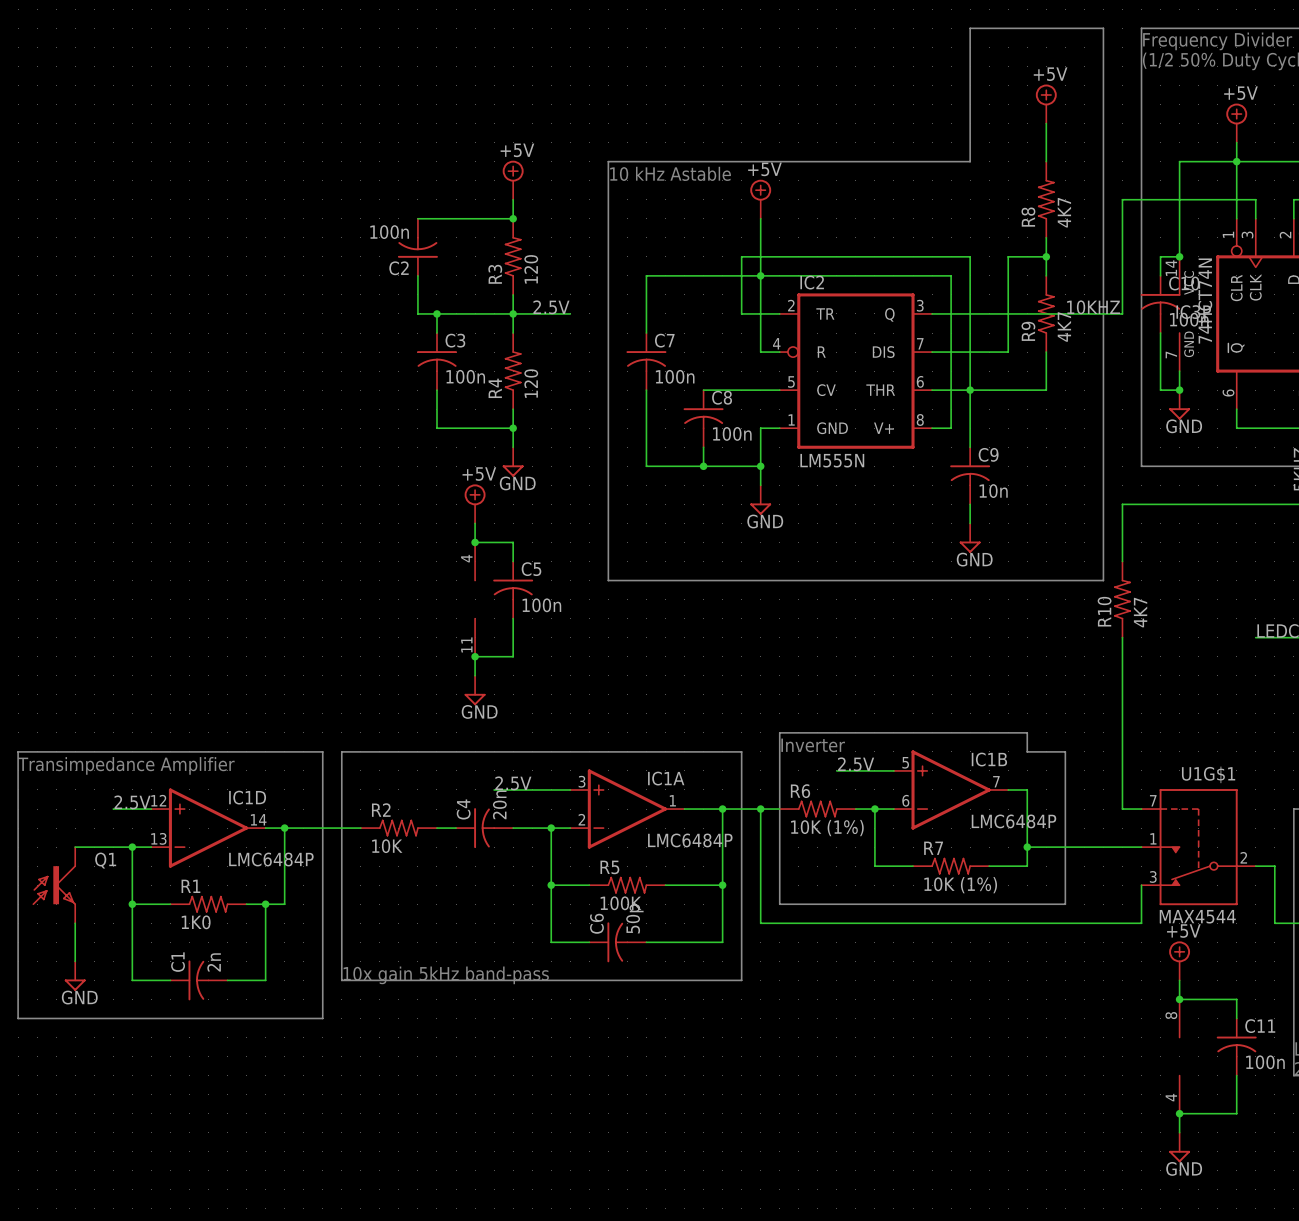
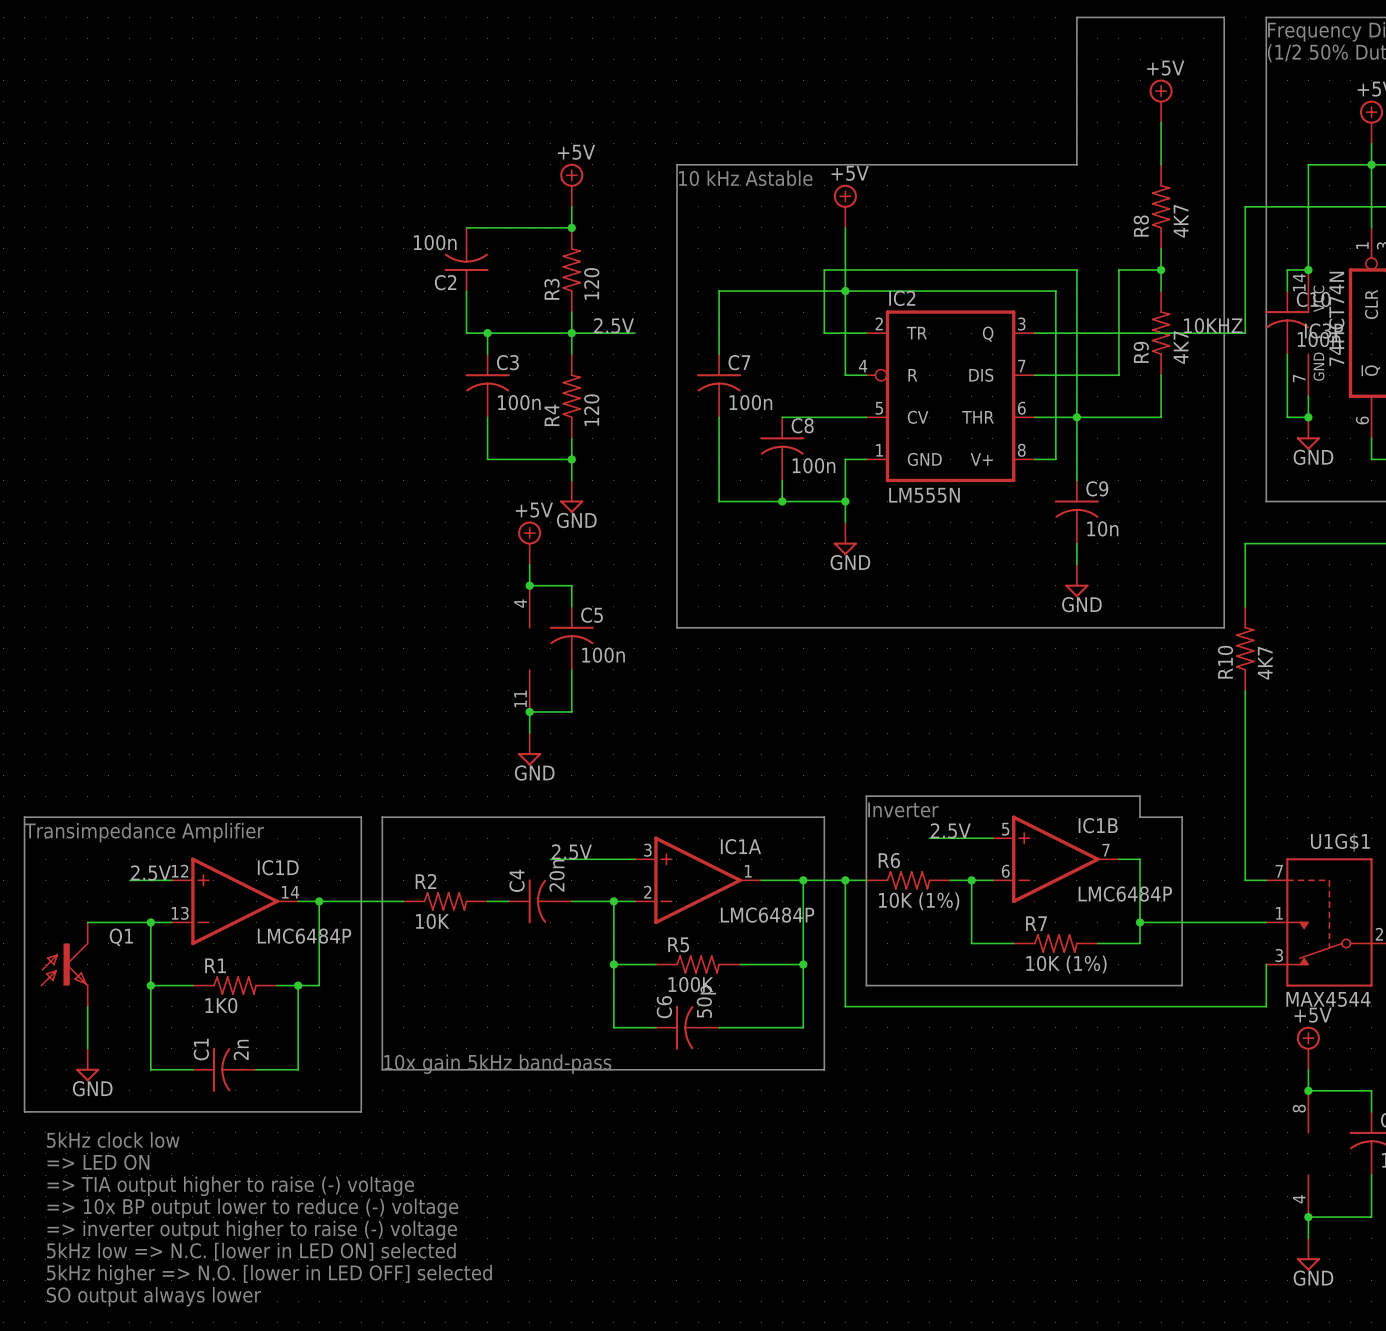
text: none -> 5kHz clock low (113, 1140)
text: none -> => LED ON (98, 1162)
text: none -> => TIA output higher to raise (-) voltage (230, 1186)
text: none -> => 10x BP output lower to reduce (-) voltage (252, 1208)
text: none -> => inverter output higher to raise (-) voltage (252, 1230)
text: none -> 5kHz low => N.C. [lower in LED ON] selected (251, 1251)
text: none -> 5kHz higher => N.O. [lower in LED OFF] selected (269, 1274)
text: none -> SO output always lower (153, 1296)

